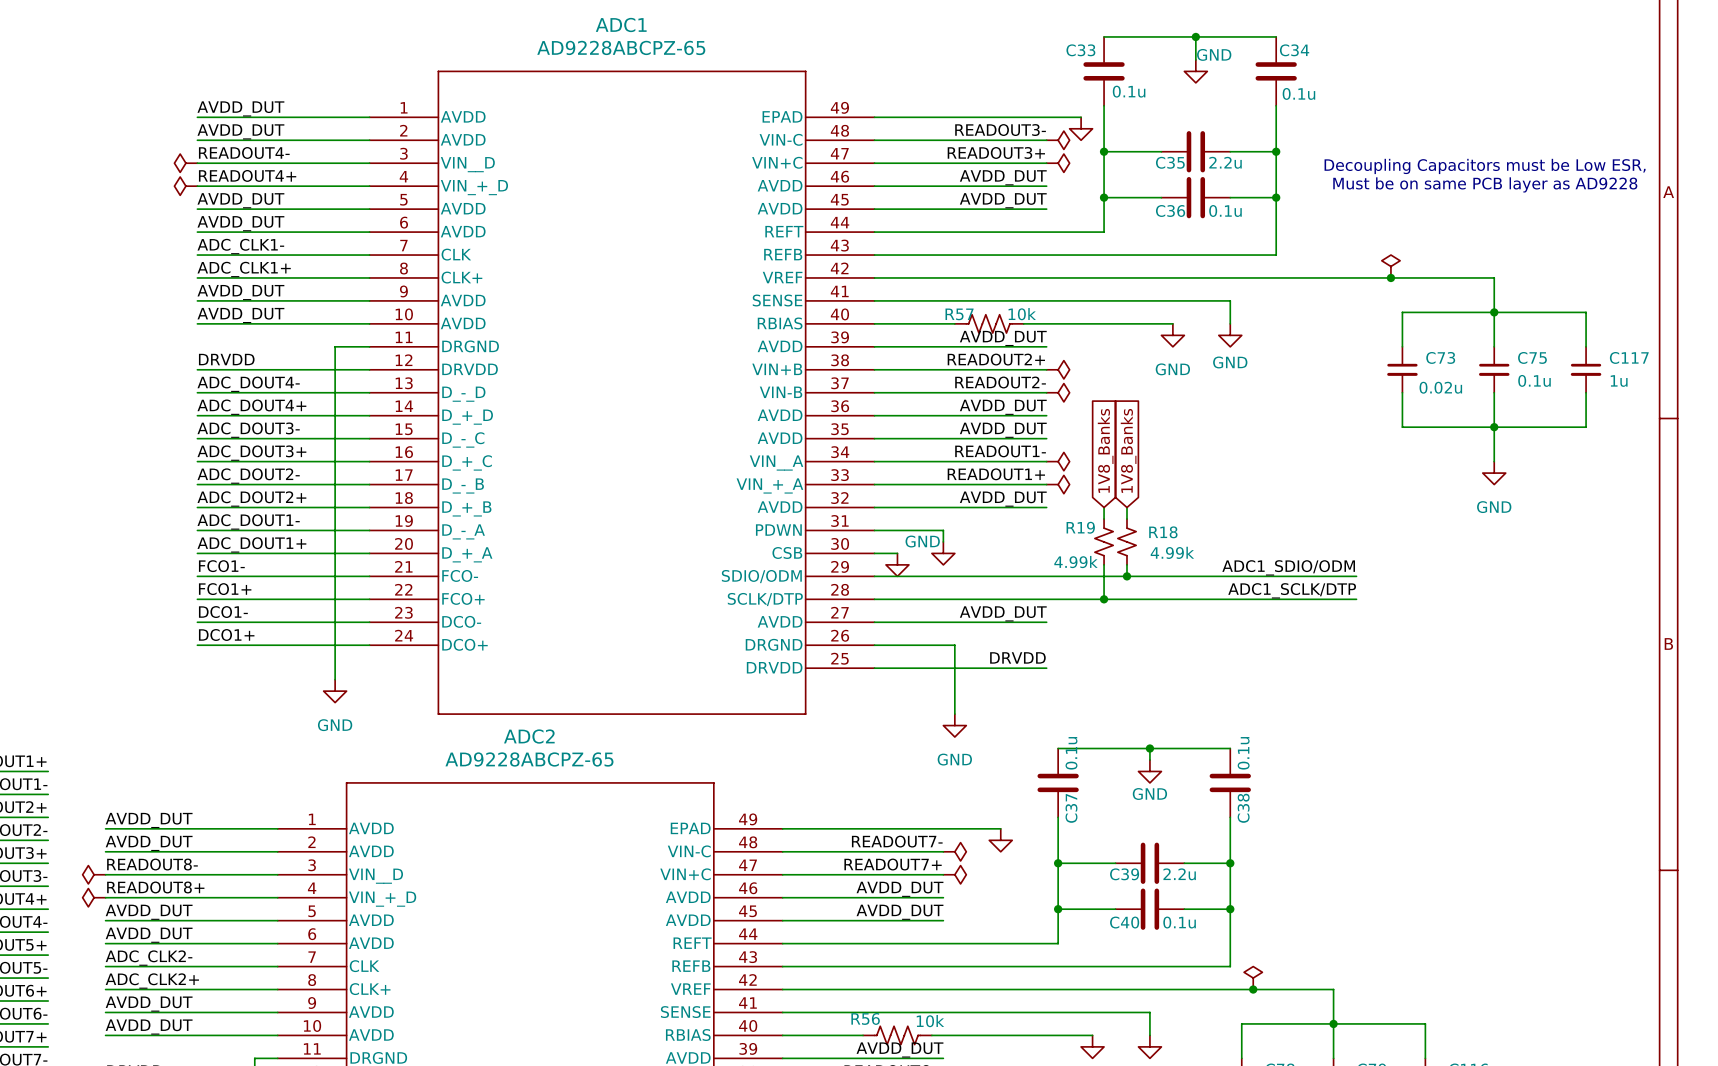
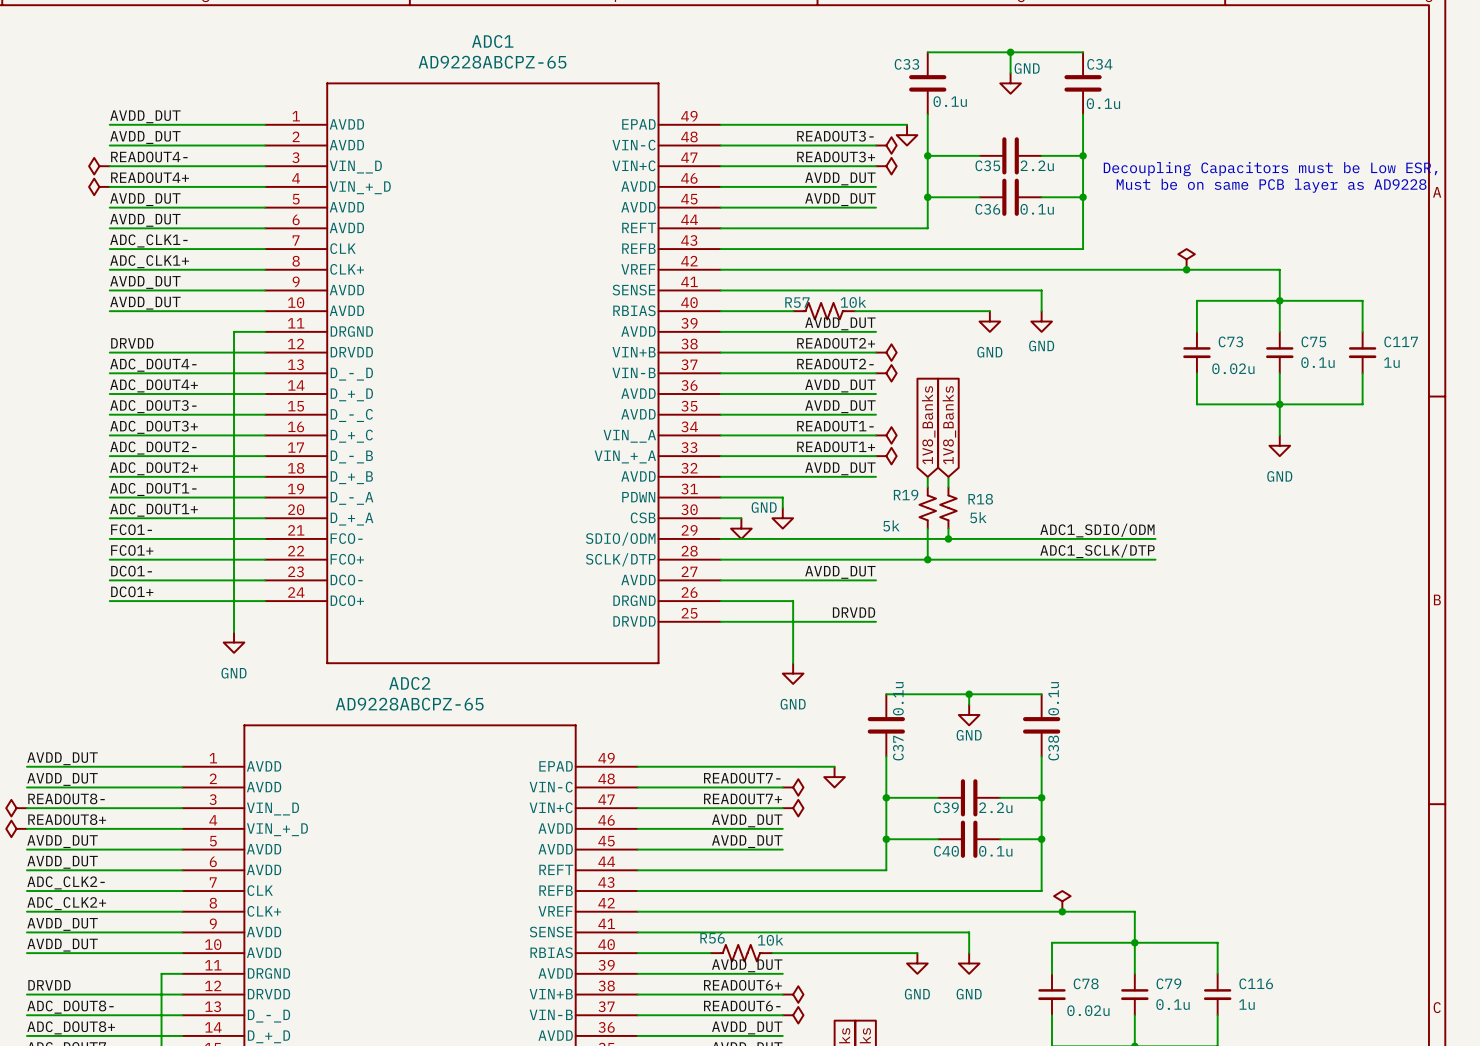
R18 value: 4.99k (1172, 552) -> 5k (978, 517)
R19 value: 4.99k (1075, 562) -> 5k (891, 525)

